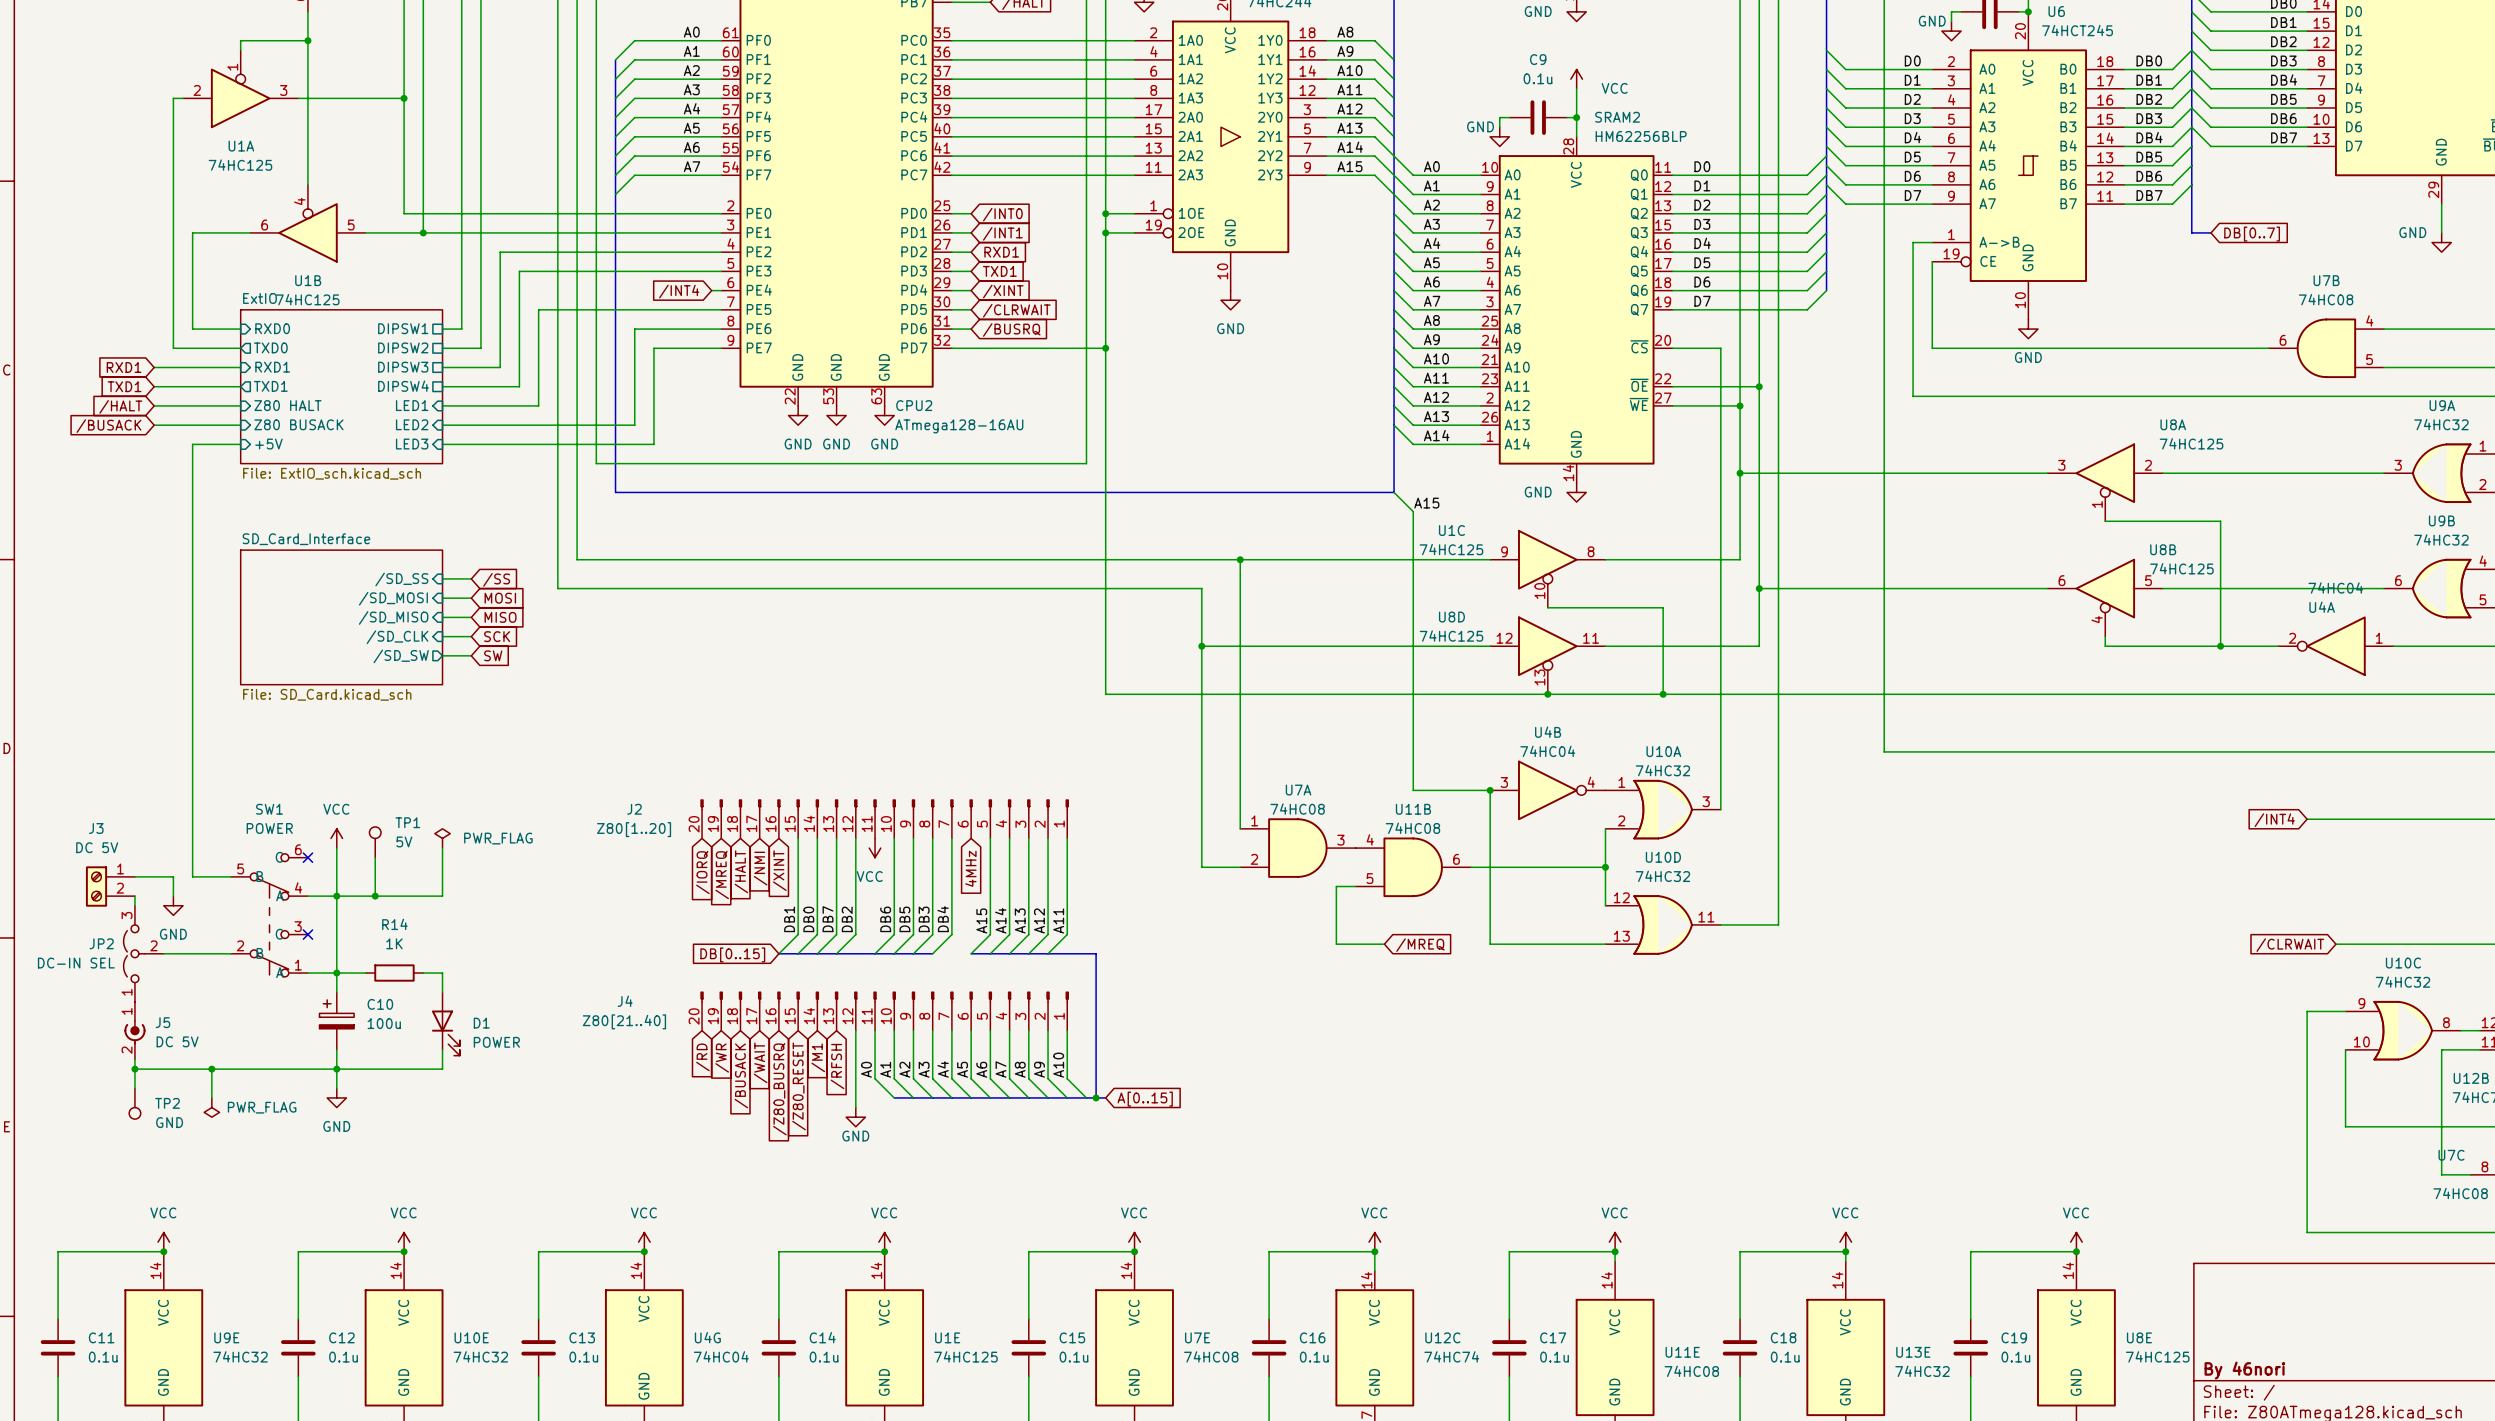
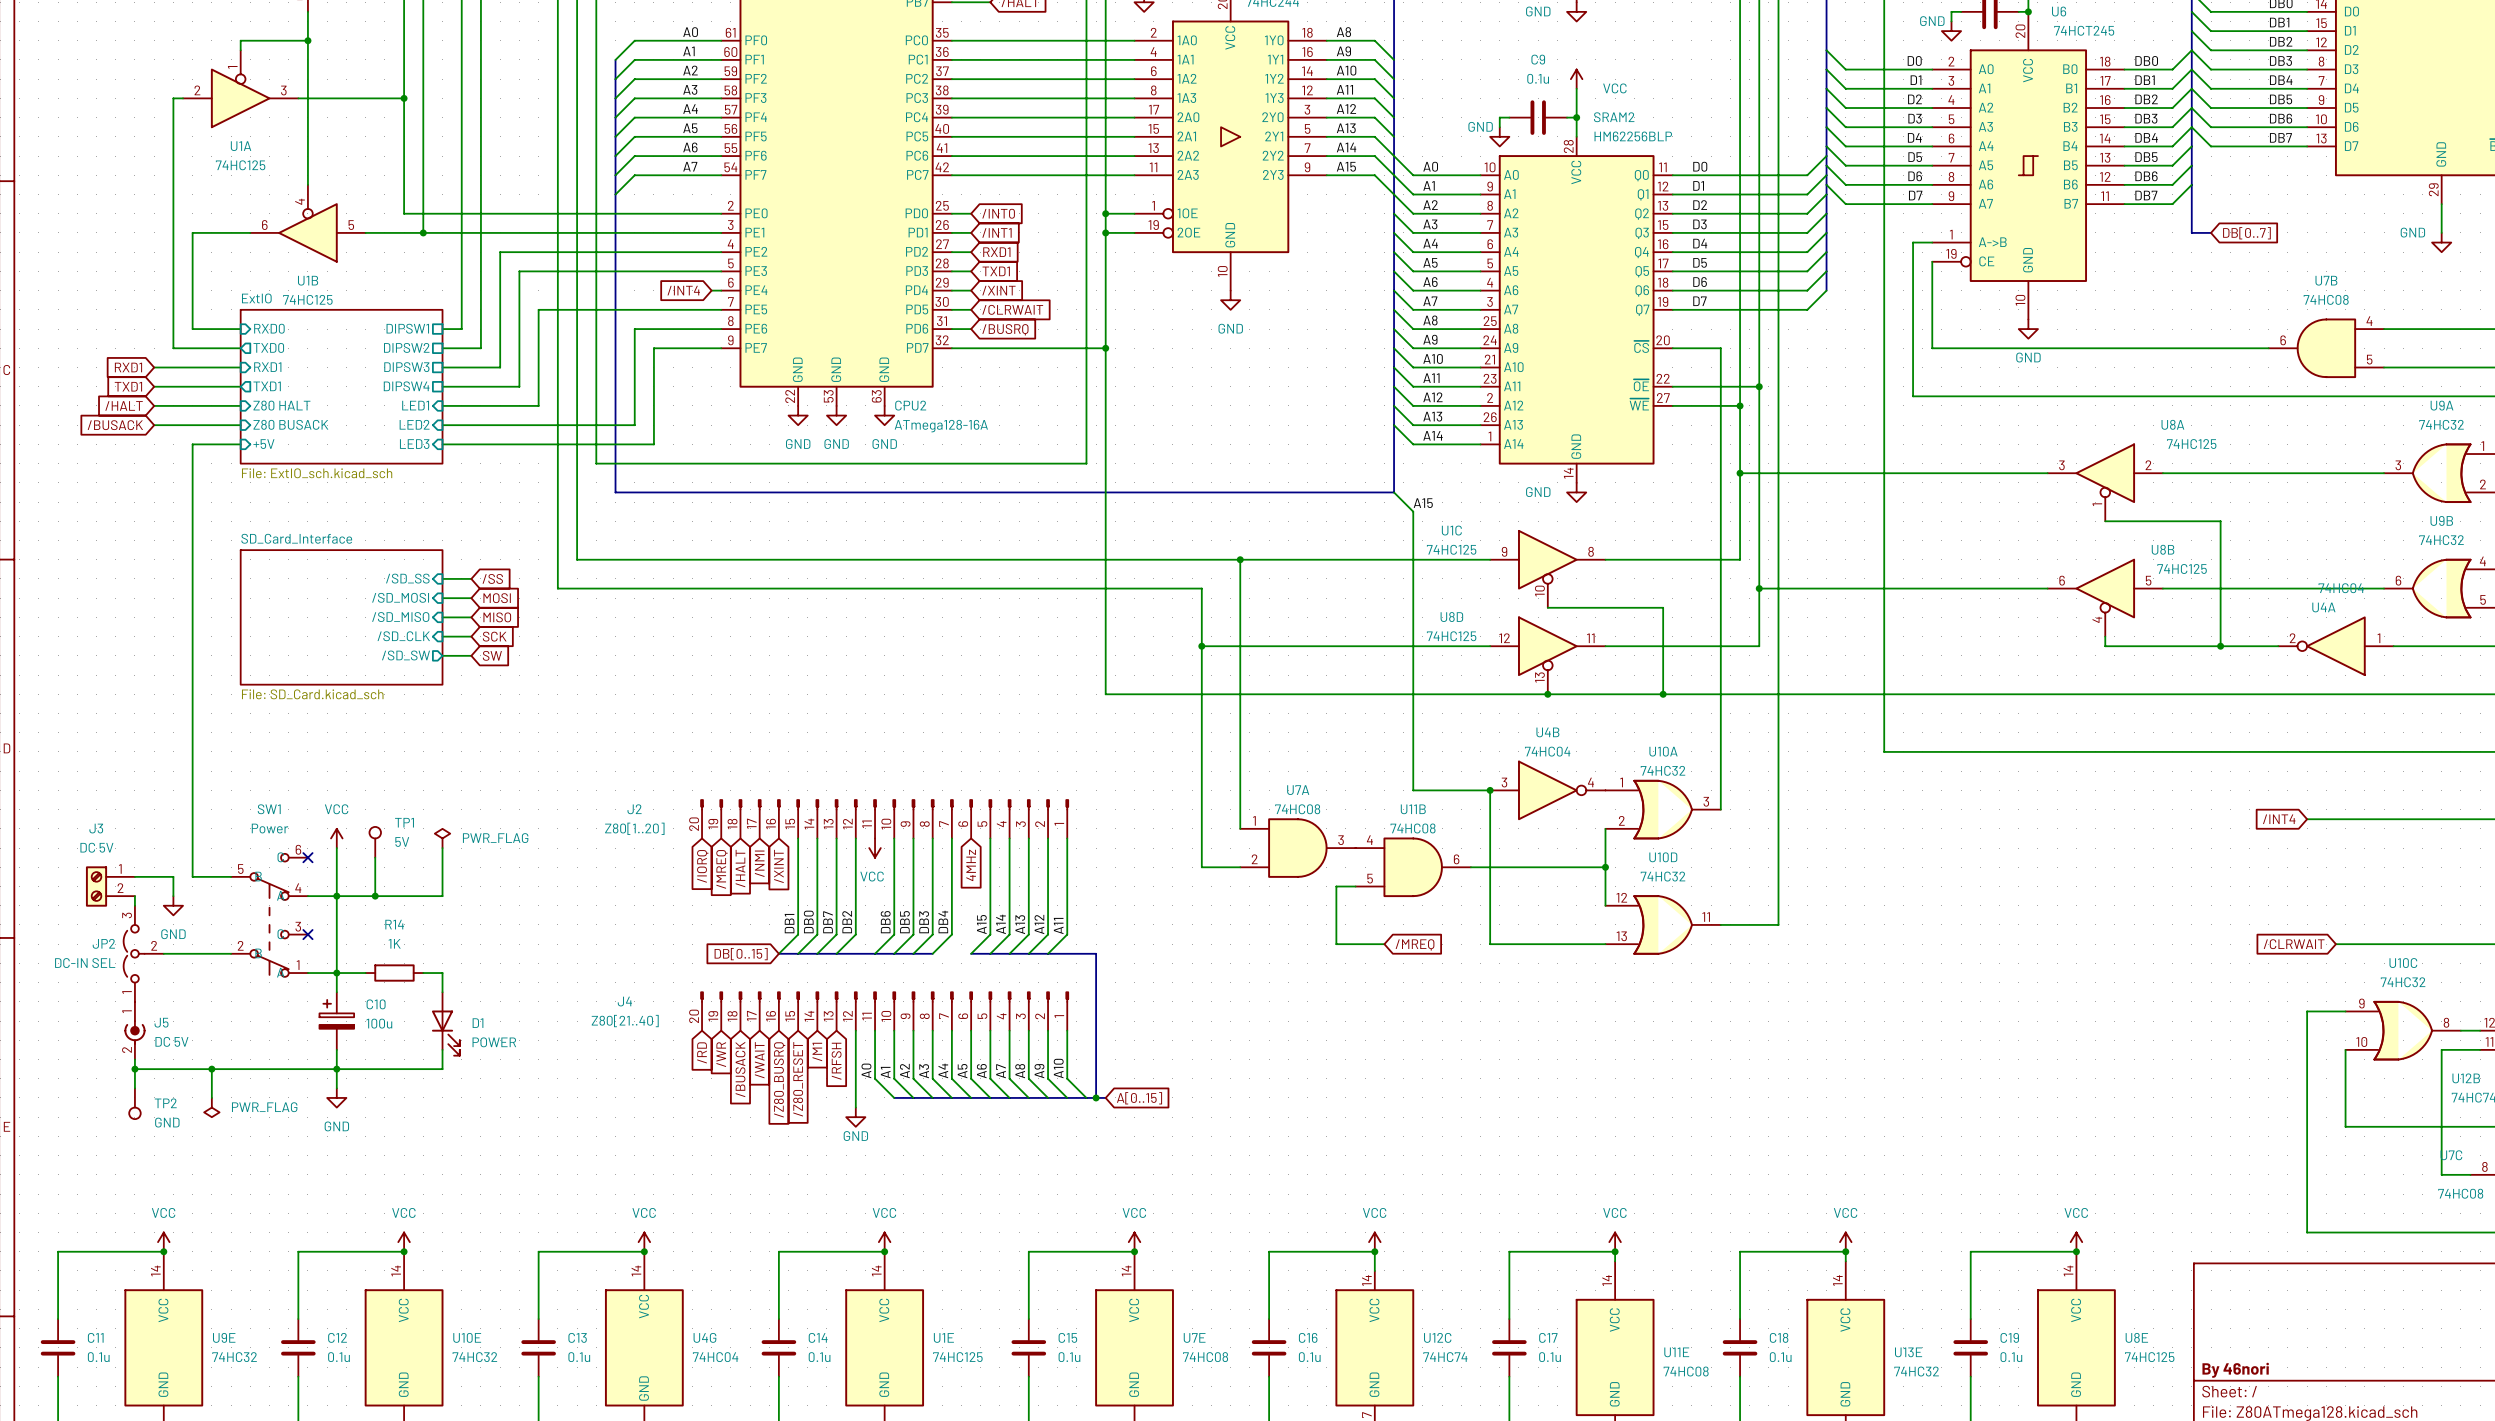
CPU2 value: ATmega128-16AU (959, 426) -> ATmega128-16A (941, 426)
SW1 value: POWER (269, 828) -> Power (270, 828)

